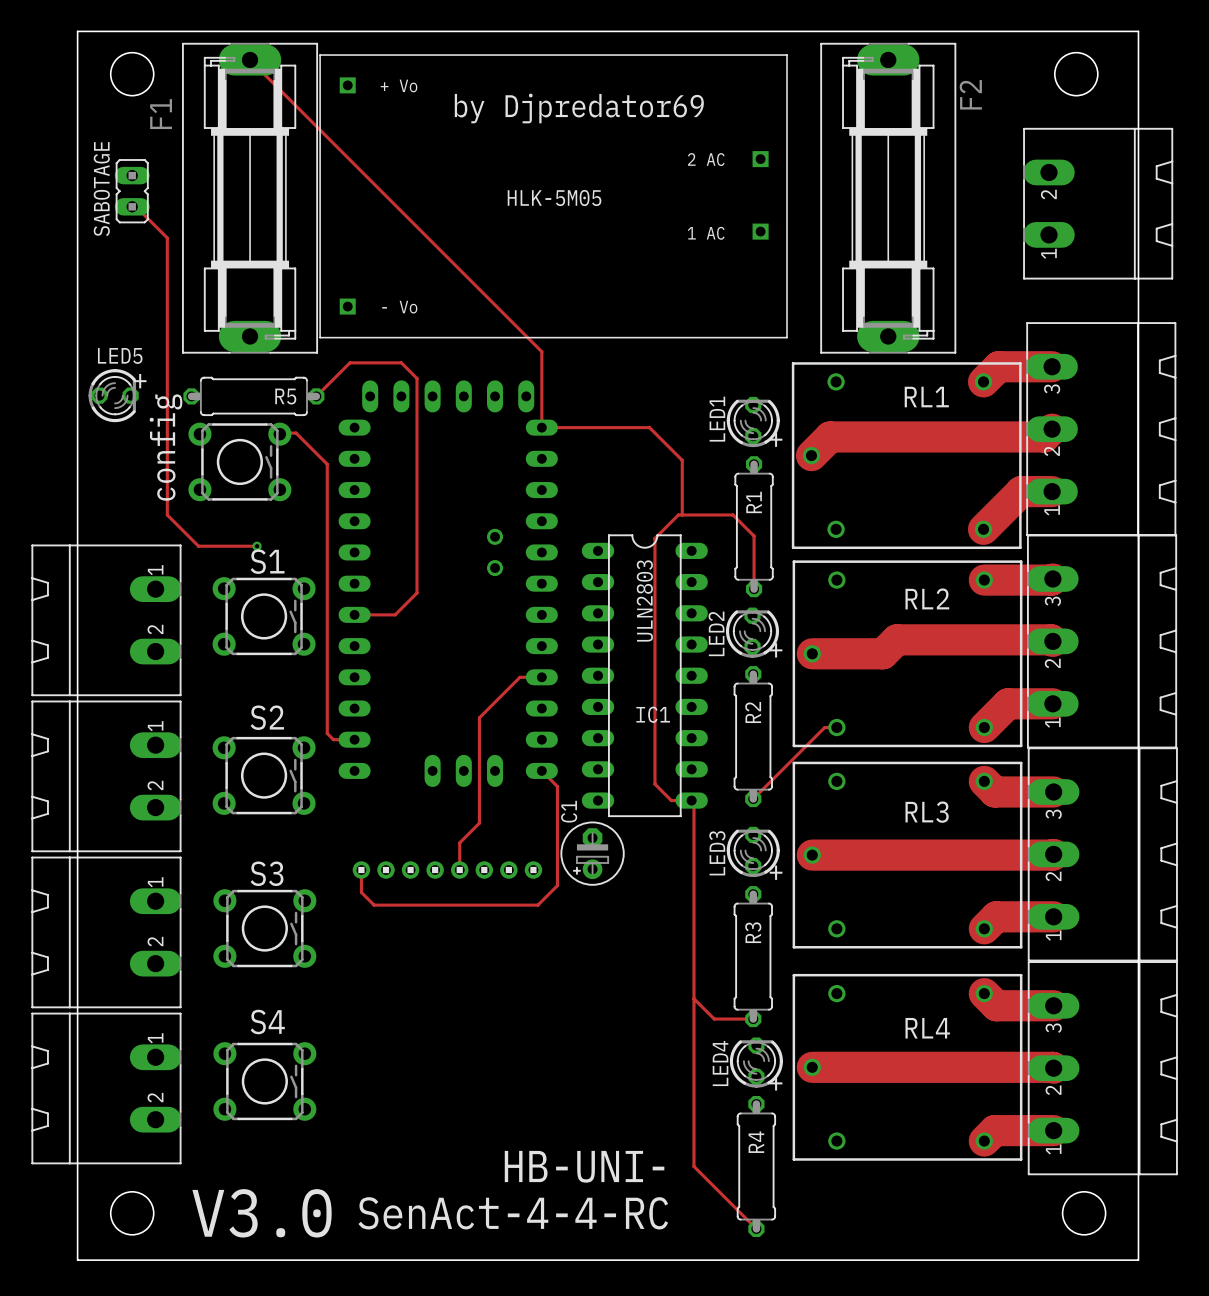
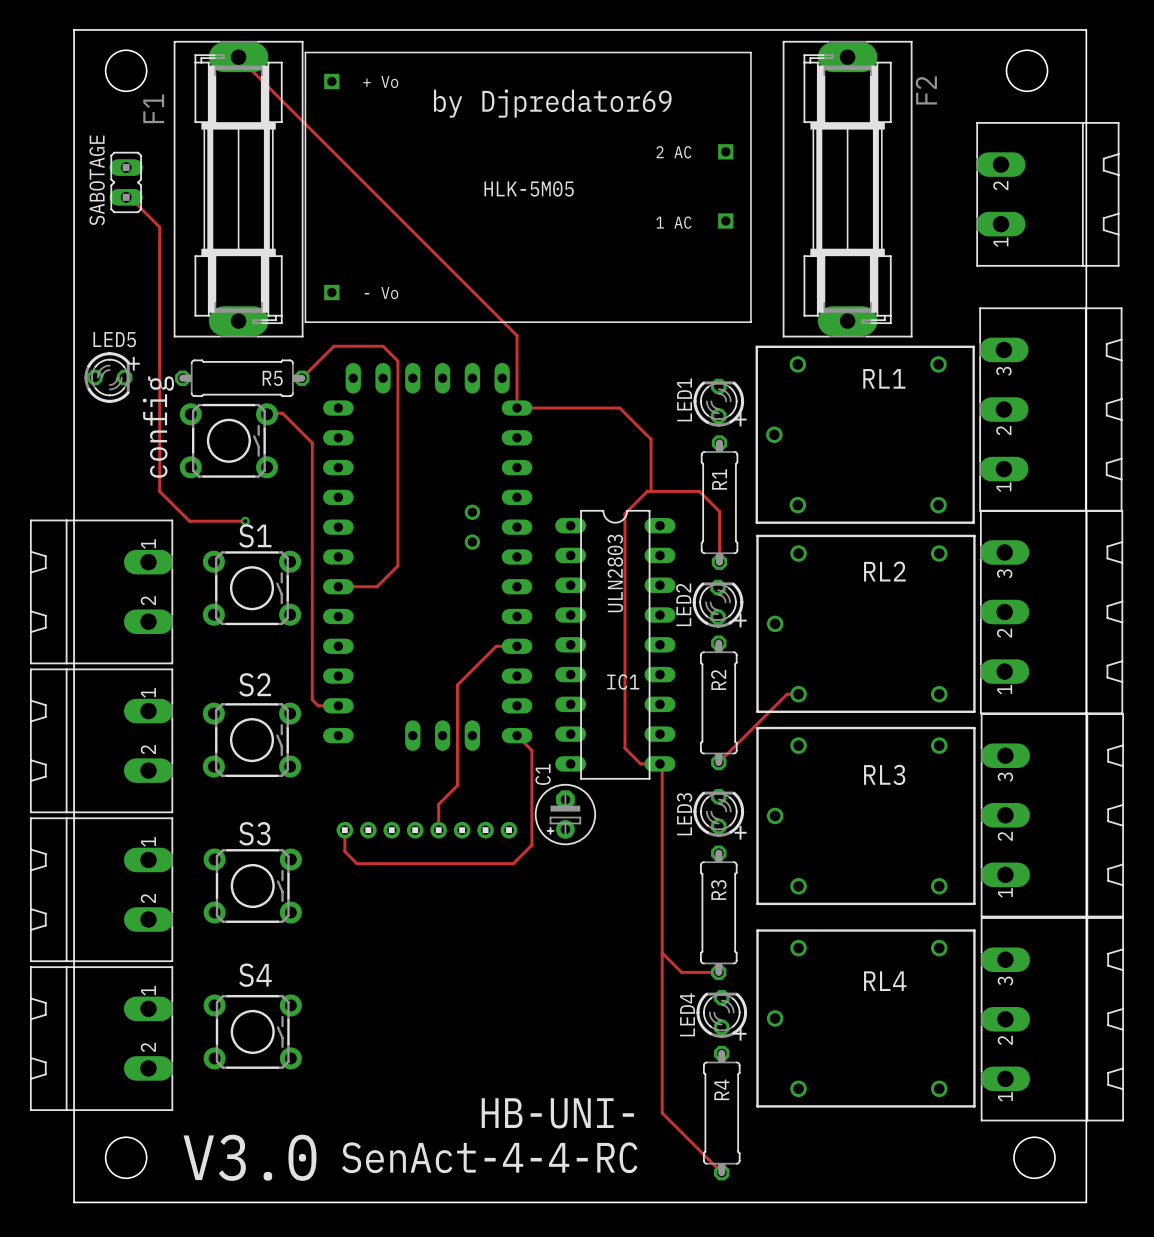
track: (1052, 366) (998, 366) (983, 381) -> none
track: (1052, 429) (1044, 436) (830, 436) (811, 455) -> none
track: (1052, 491) (1021, 491) (983, 529) -> none
track: (1052, 578) (984, 580) -> none
track: (1052, 641) (1051, 639) (896, 639) (882, 653) (812, 653) -> none
track: (1052, 703) (1008, 703) (984, 727) -> none
track: (984, 781) (994, 791) (1053, 791) -> none
track: (1053, 854) (812, 855) -> none
track: (1053, 916) (996, 916) (984, 928) -> none
track: (984, 993) (996, 1005) (1053, 1005) -> none
track: (812, 1067) (1053, 1068) -> none
track: (1053, 1130) (994, 1130) (984, 1141) -> none

